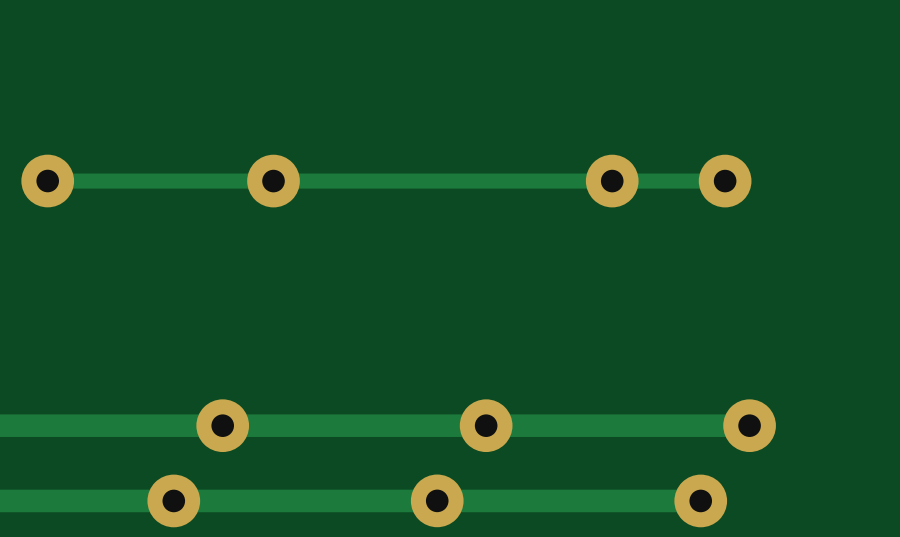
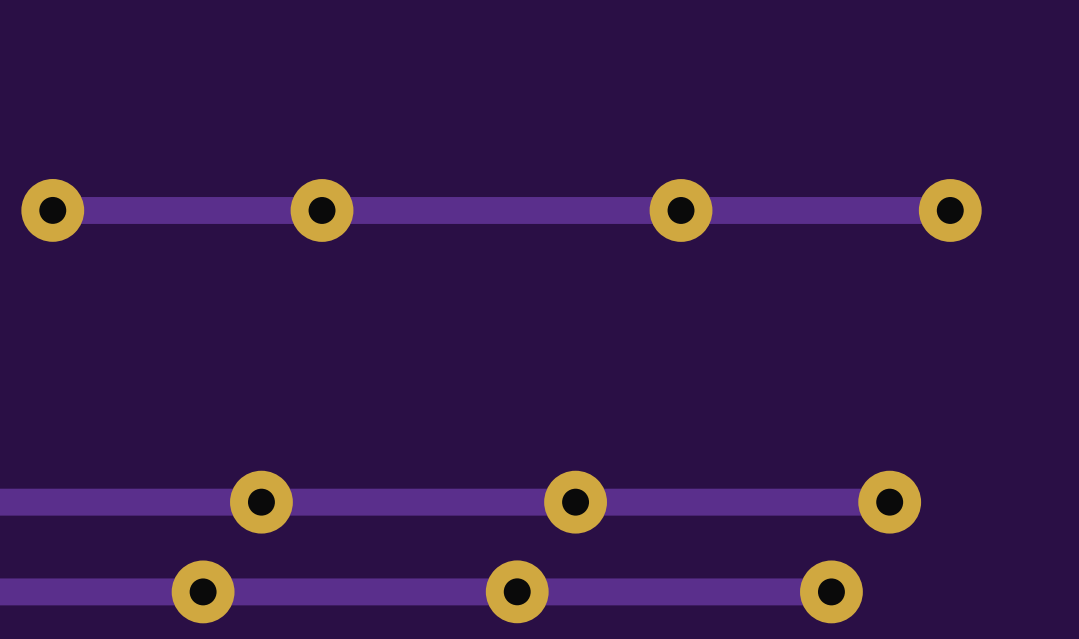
via position: (612, 181) -> (681, 210)
track width: thin (725, 181) (47, 181) -> thick (860, 210) (52, 210)
via: (725, 181) -> none
track: none -> (950, 210) (860, 210)
via: none -> (950, 210)

